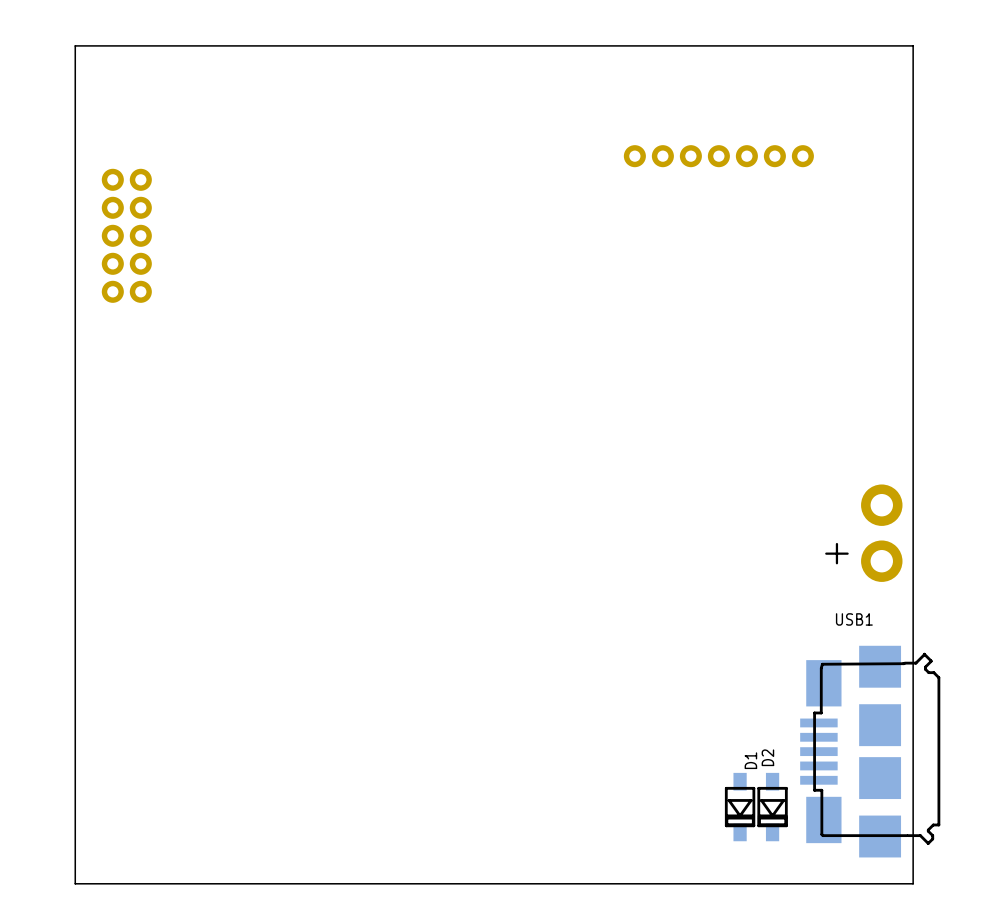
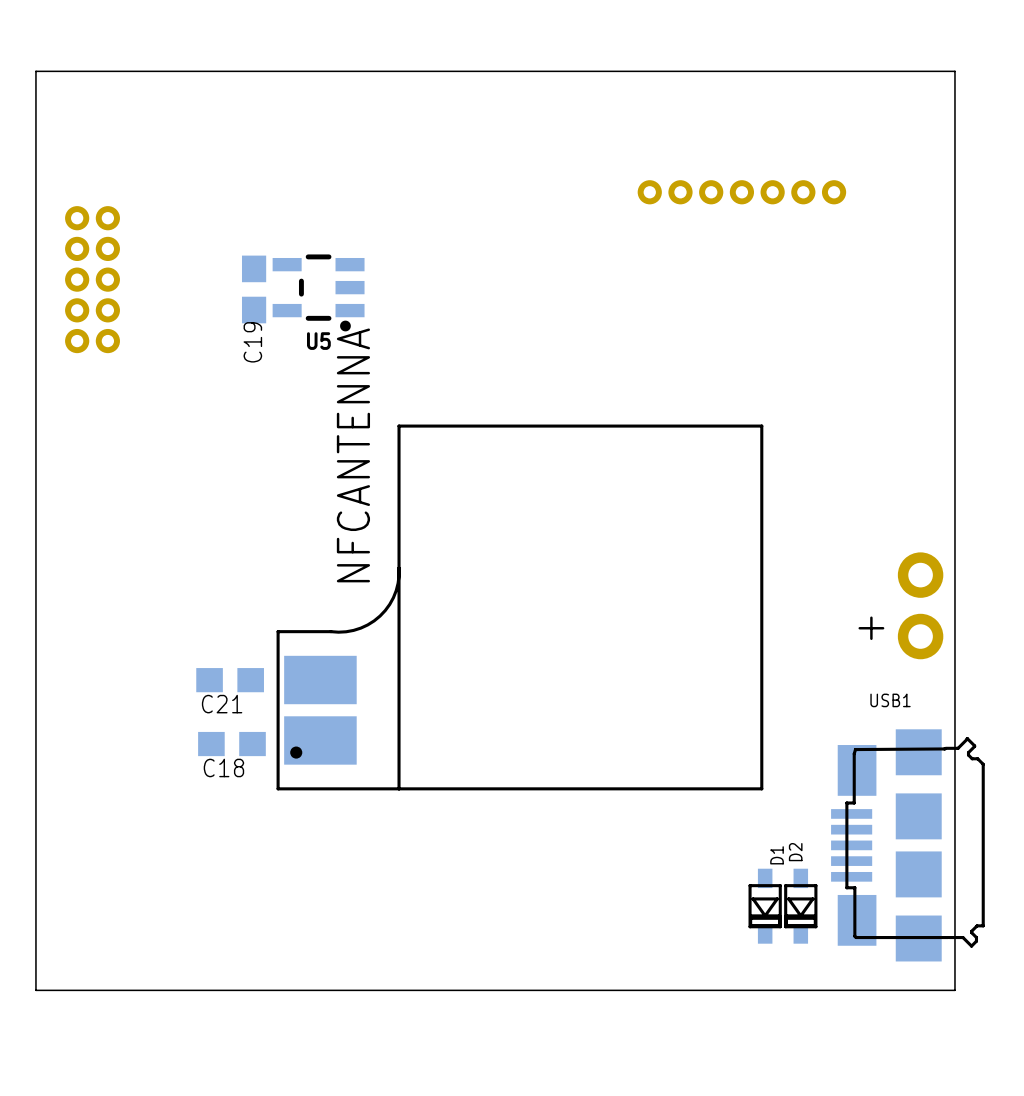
C19: none -> (254, 289)
U5: none -> (318, 292)
NFCANTENNA: none -> (519, 607)
C21: none -> (230, 680)
C18: none -> (231, 744)

